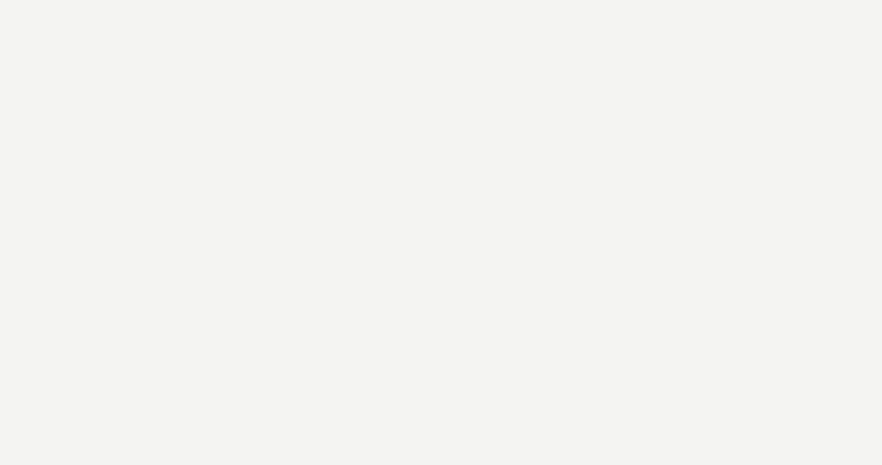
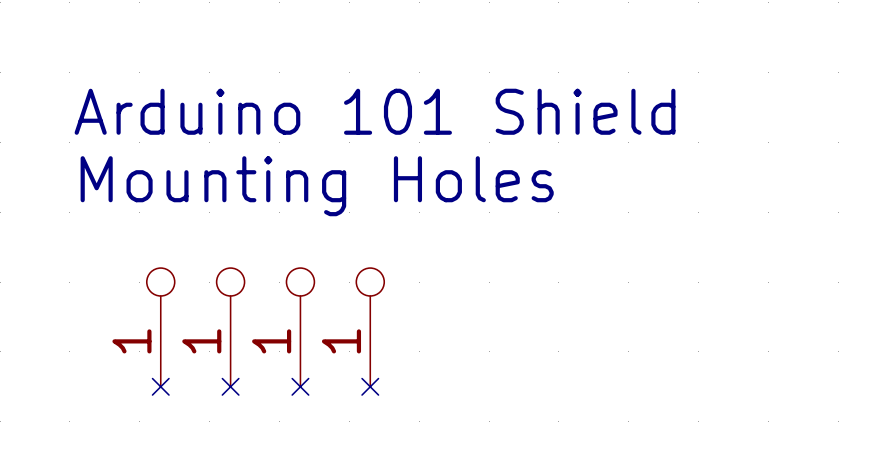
text: none -> Arduino 101 Shield (375, 111)
text: none -> Mounting Holes (317, 186)
part: none -> (160, 331)
part: none -> (230, 331)
part: none -> (300, 331)
part: none -> (370, 331)

